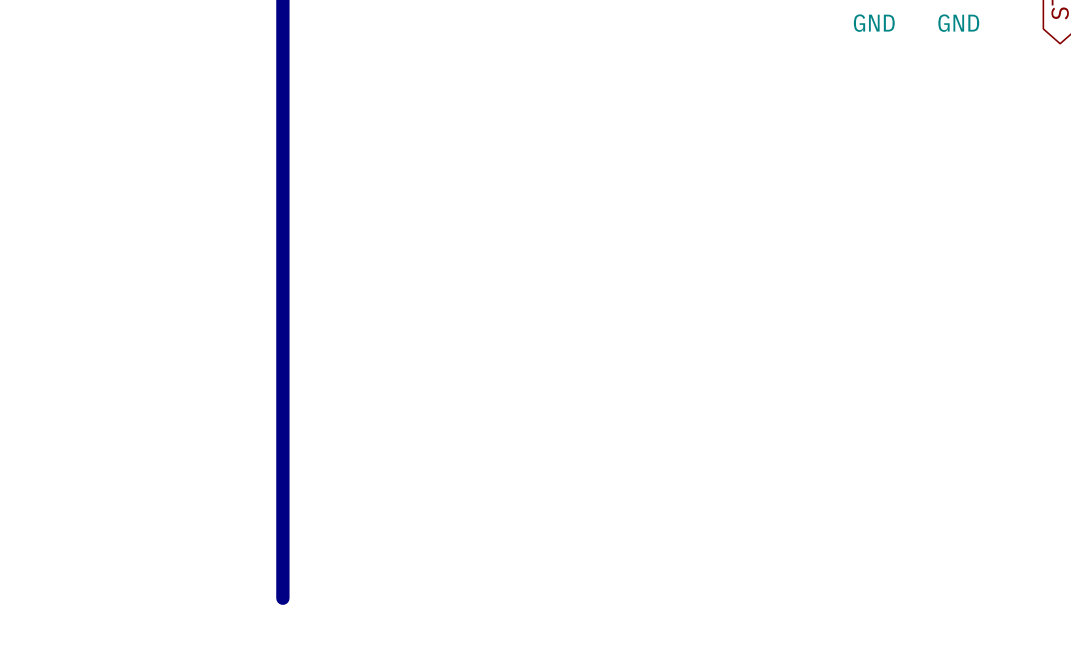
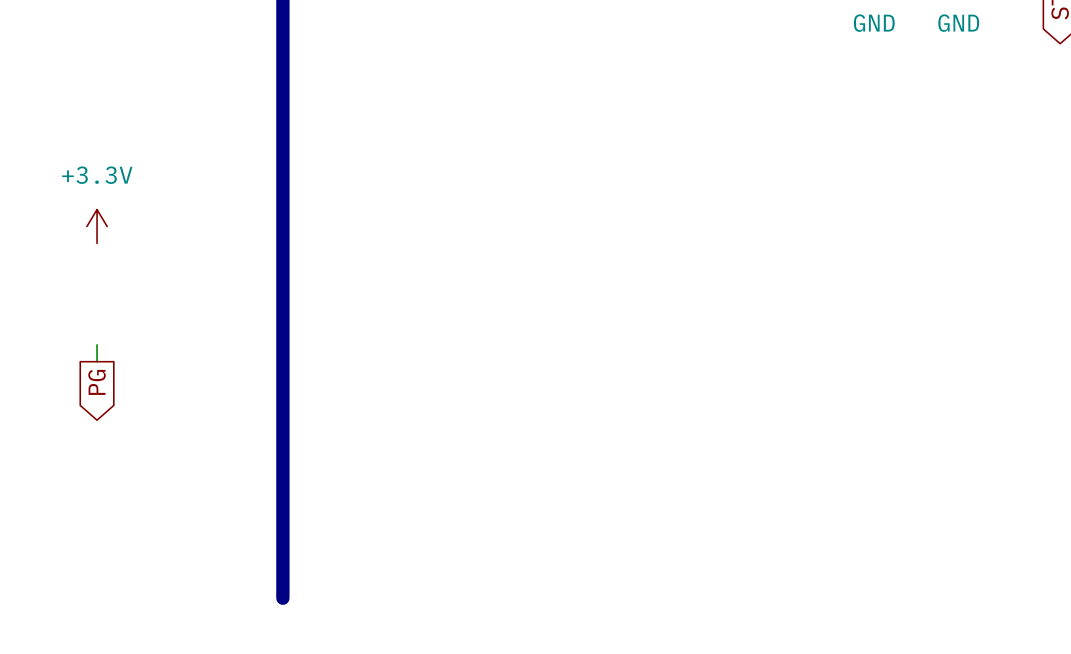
power symbol: none -> +3.3V (97, 226)
wire: none -> (97, 344) (97, 361)
global label: none -> PG (97, 382)

